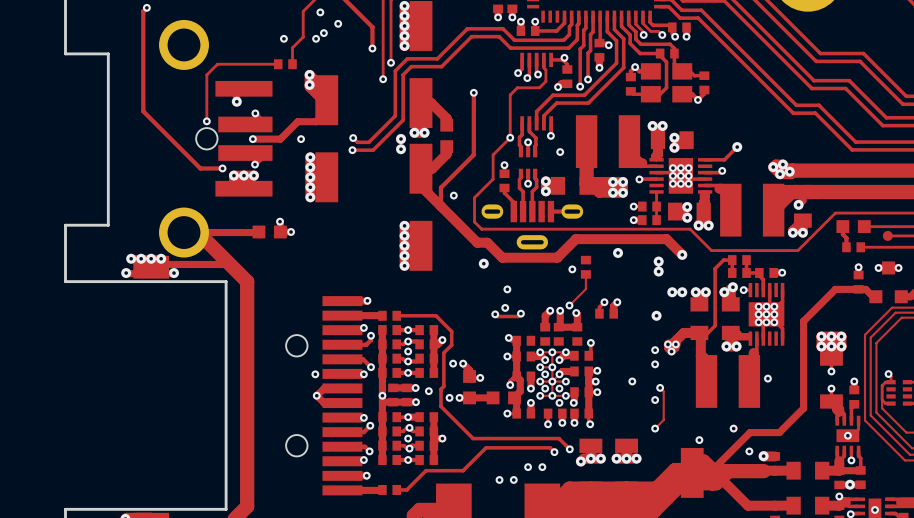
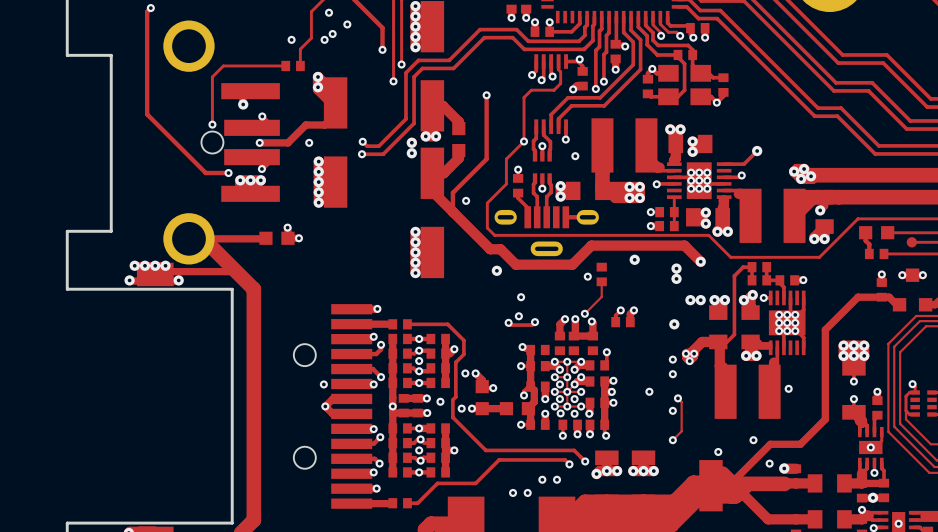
via: none -> (581, 377)
via: none -> (560, 413)

